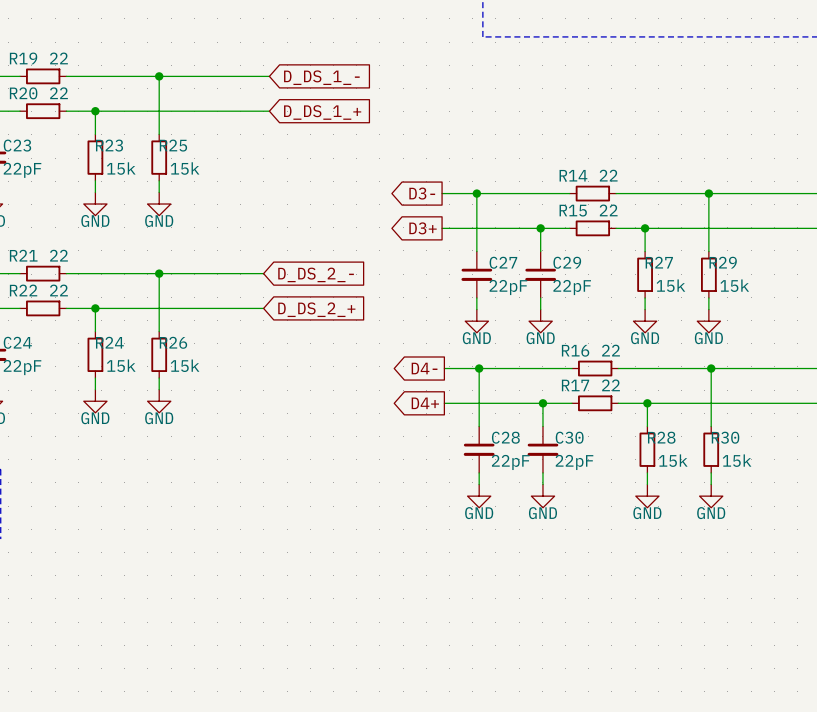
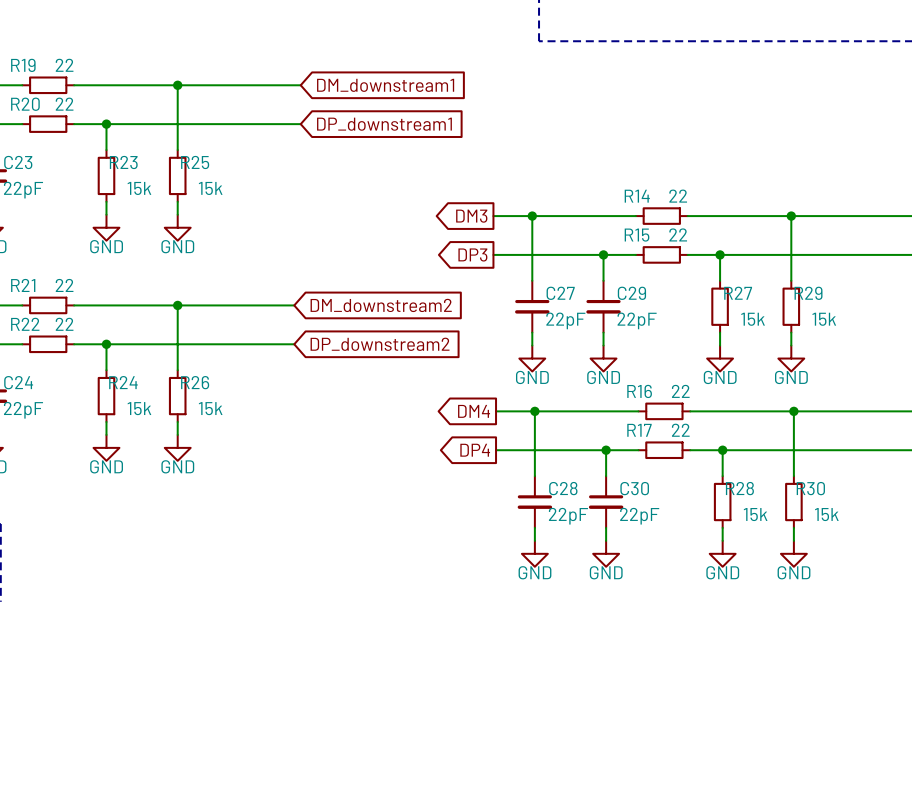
global label: D_DS_1_- (321, 77) -> DM_downstream1 (385, 85)
global label: D_DS_1_+ (322, 112) -> DP_downstream1 (384, 124)
global label: D3- (422, 193) -> DM3 (471, 216)
global label: D3+ (423, 228) -> DP3 (472, 254)
global label: D_DS_2_- (316, 274) -> DM_downstream2 (381, 305)
global label: D_DS_2_+ (316, 309) -> DP_downstream2 (380, 344)
global label: D4- (424, 368) -> DM4 (474, 411)
global label: D4+ (425, 403) -> DP4 (475, 450)

